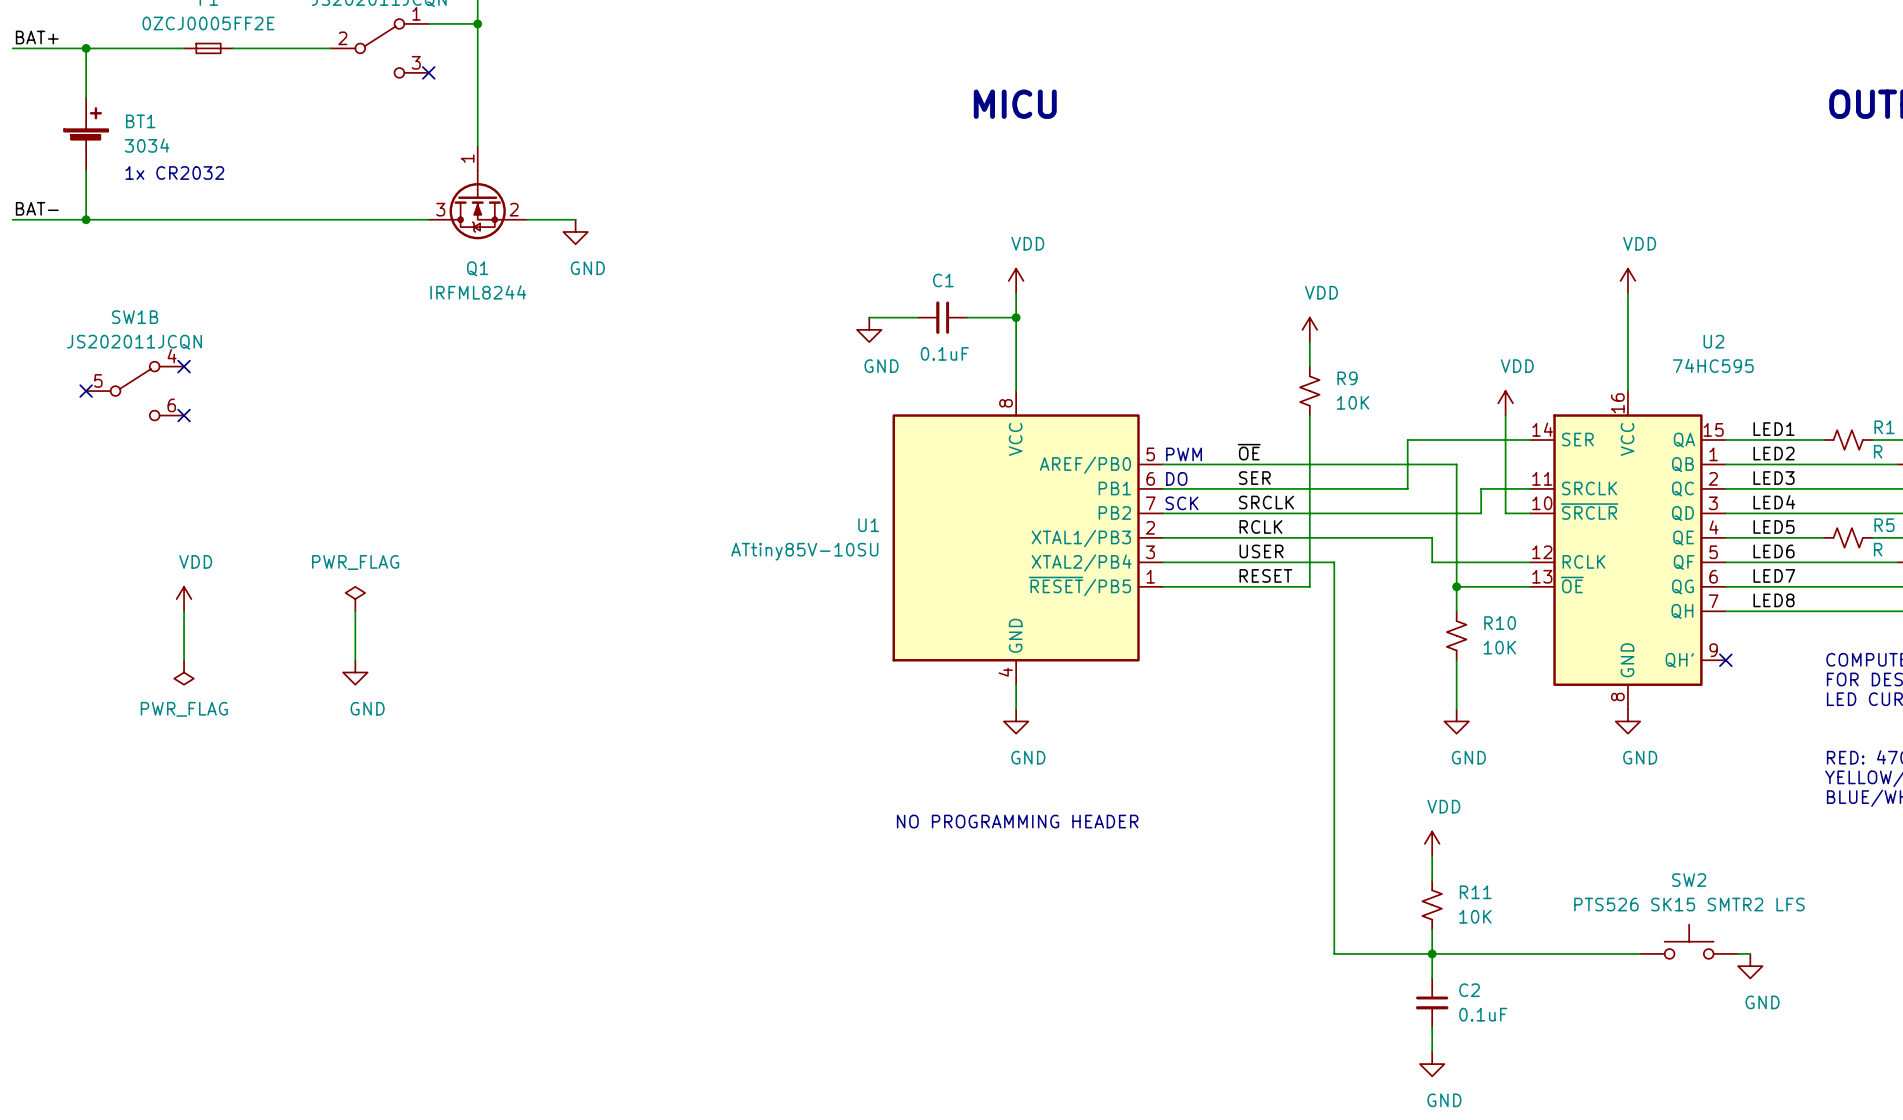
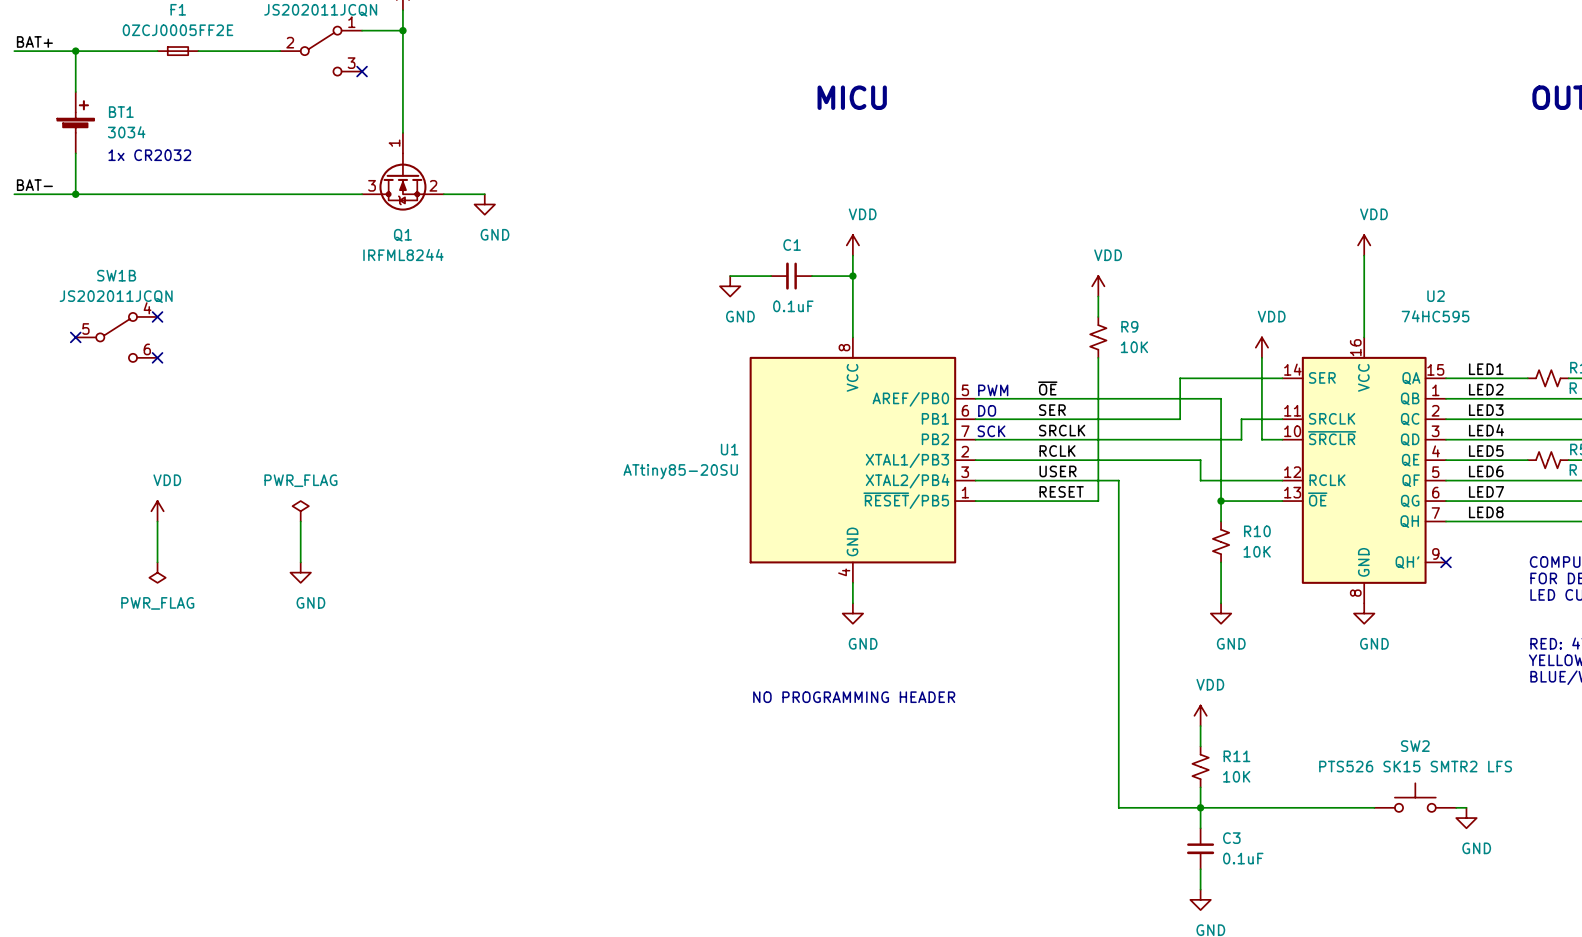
U1 value: ATtiny85V-10SU (804, 551) -> ATtiny85-20SU (680, 471)
C2 name: C2 (1469, 990) -> C3 (1231, 838)

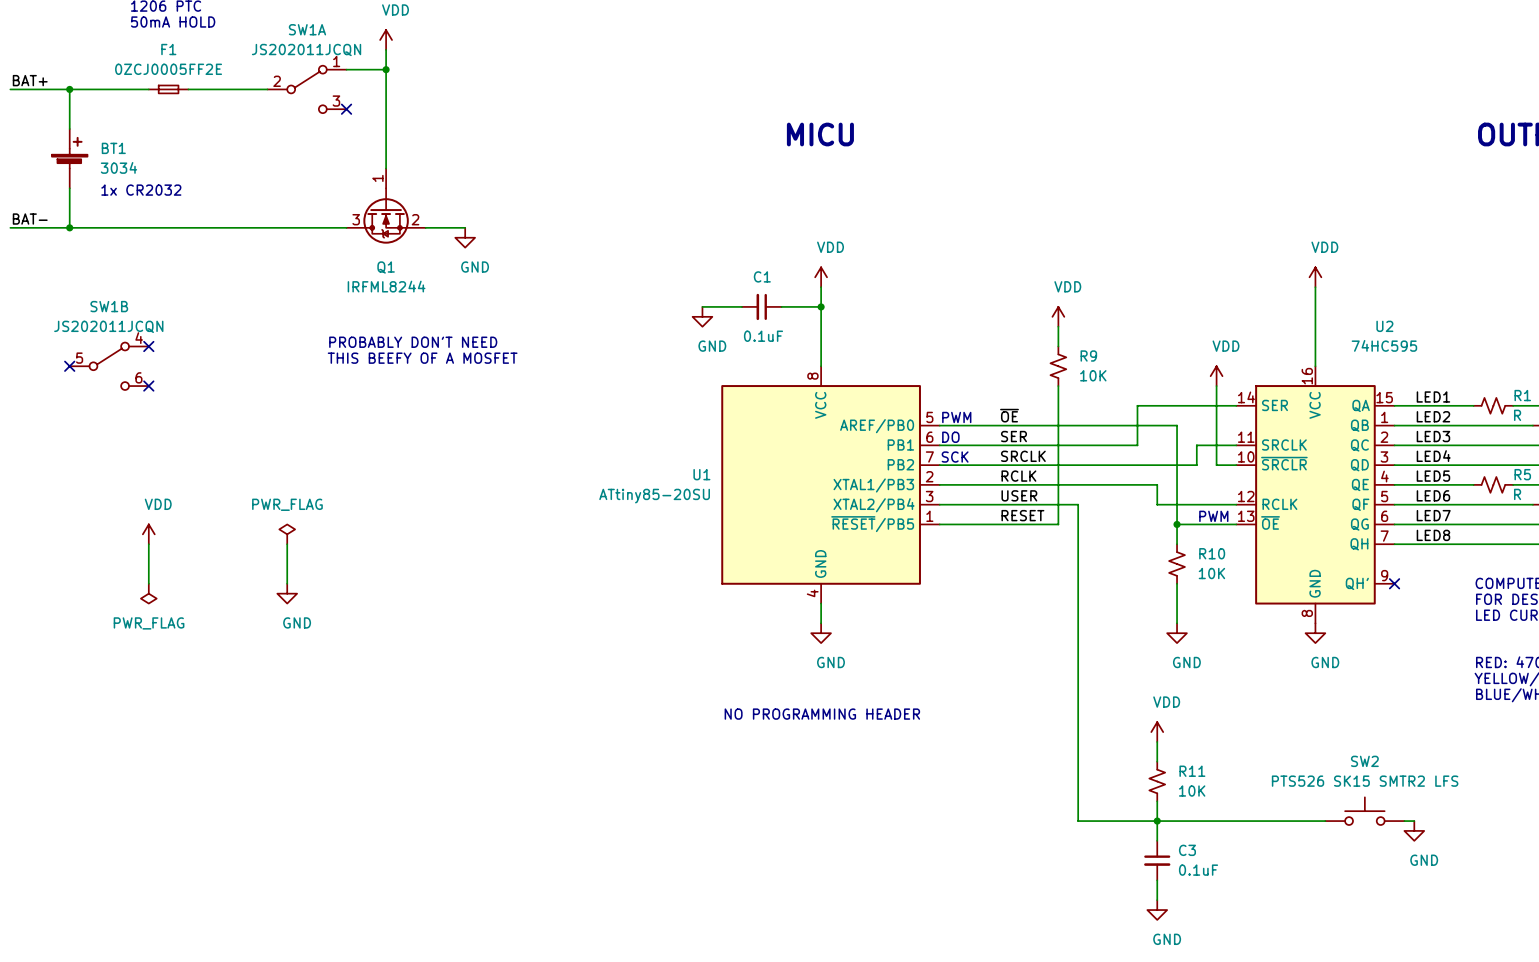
text: none -> PROBABLY DON'T NEED (413, 342)
text: none -> THIS BEEFY OF A MOSFET (422, 358)
text: none -> PWM (1213, 516)

